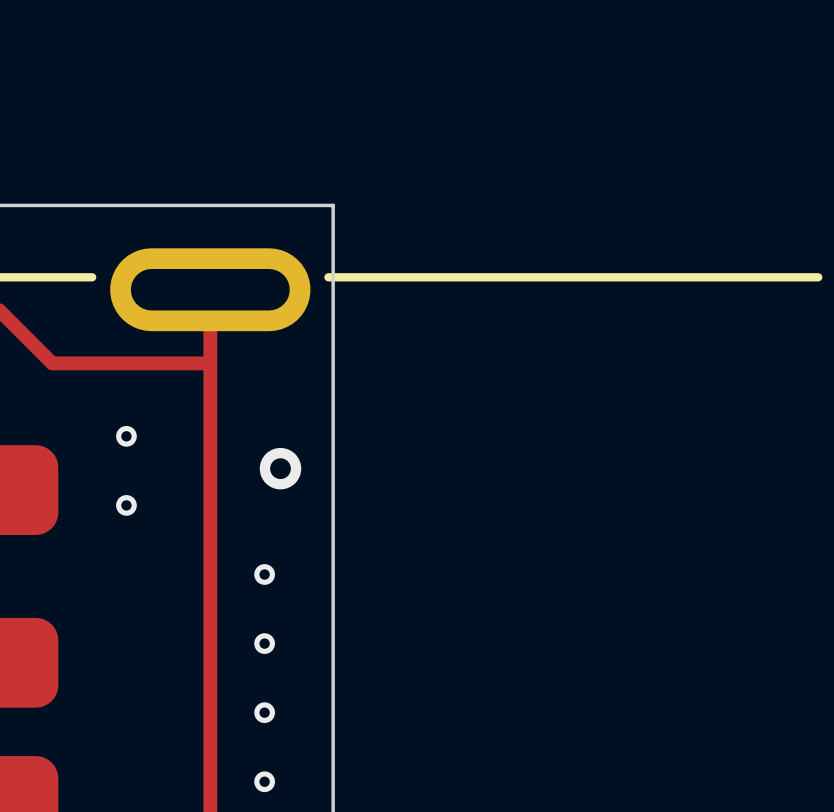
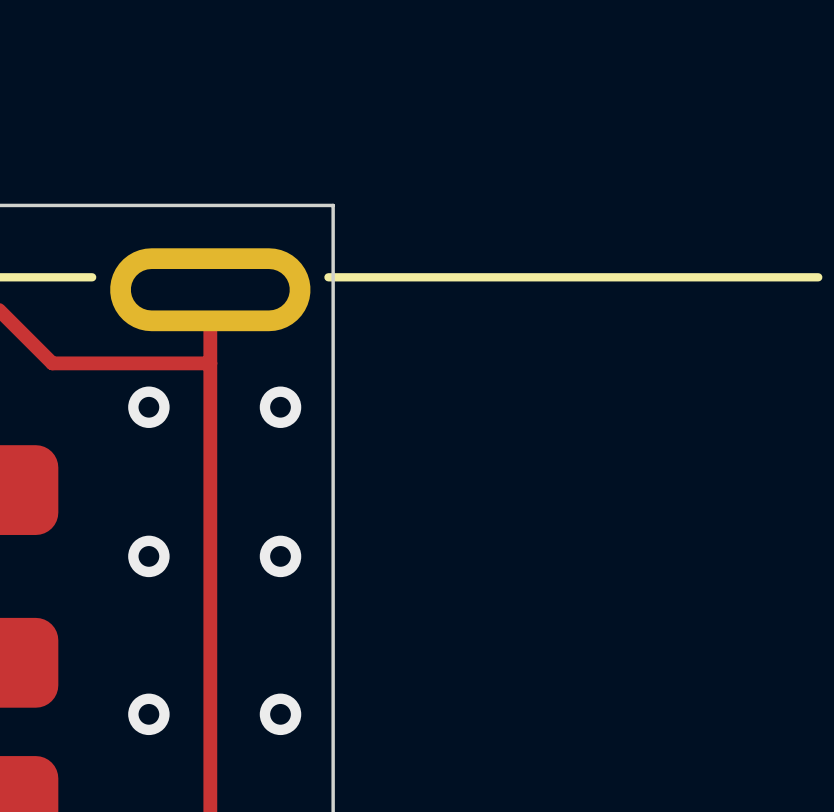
via: none -> (280, 407)
via size: [116, 425, 137, 447] -> [128, 386, 170, 428]
via: (280, 468) -> none
via: (126, 505) -> none
via: none -> (148, 556)
via size: [254, 564, 275, 585] -> [259, 535, 302, 578]
via: (264, 643) -> none
via size: [254, 702, 275, 724] -> [259, 693, 302, 736]
via: none -> (148, 714)
via: (264, 781) -> none

